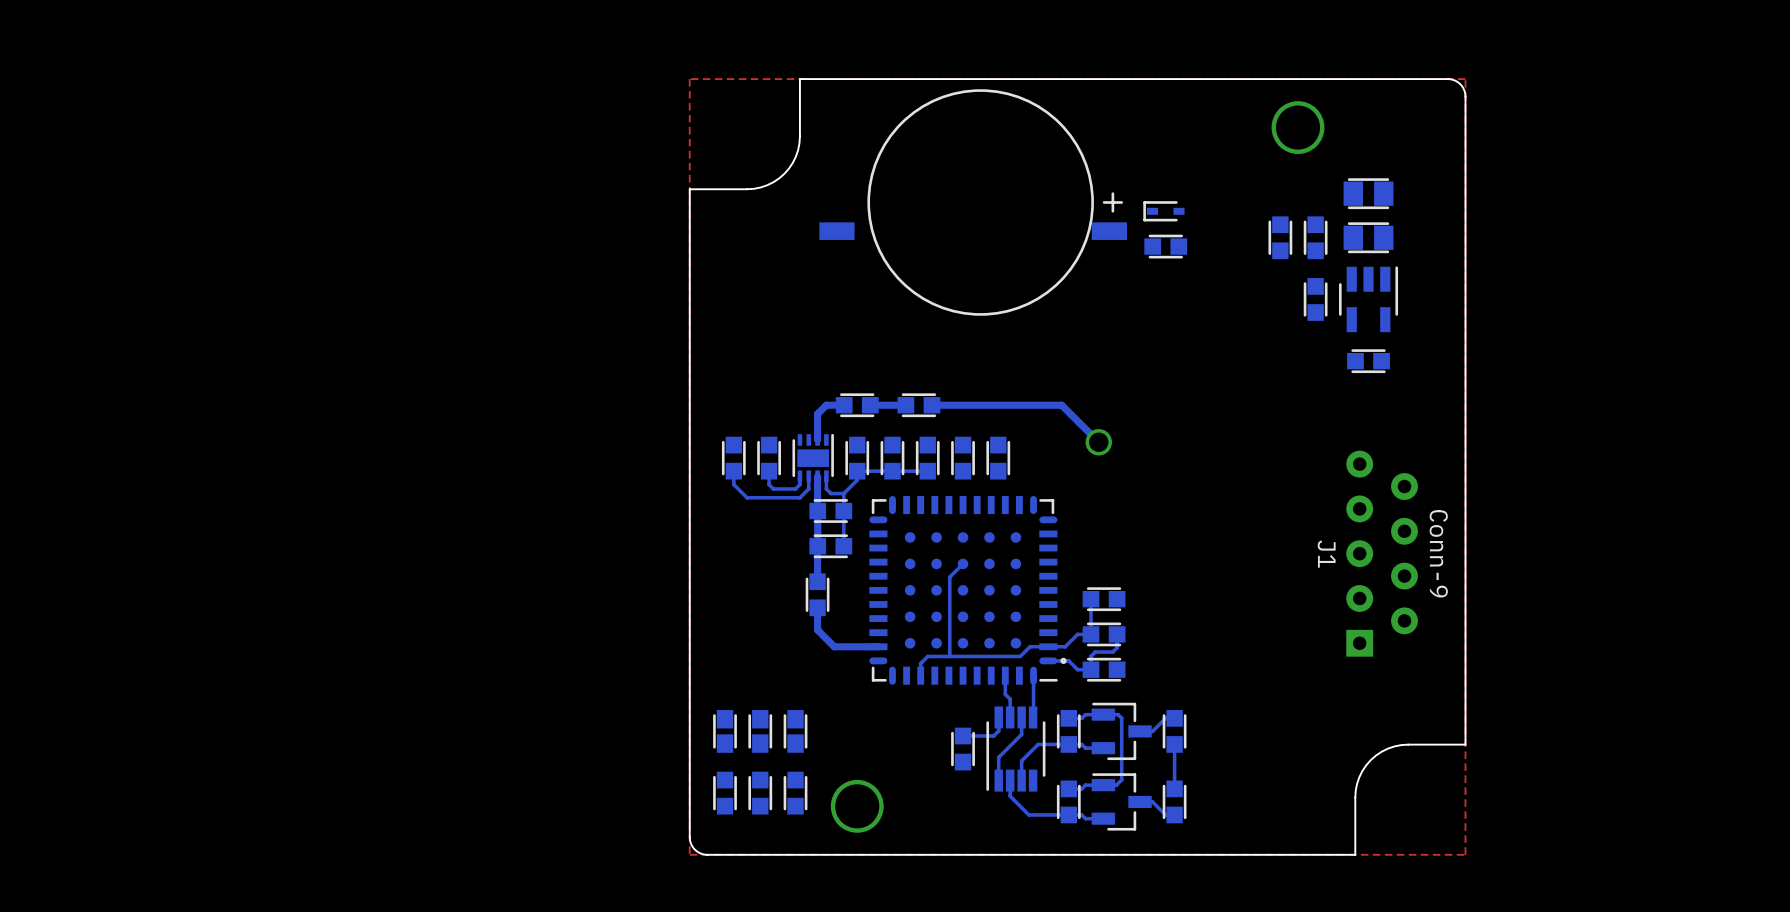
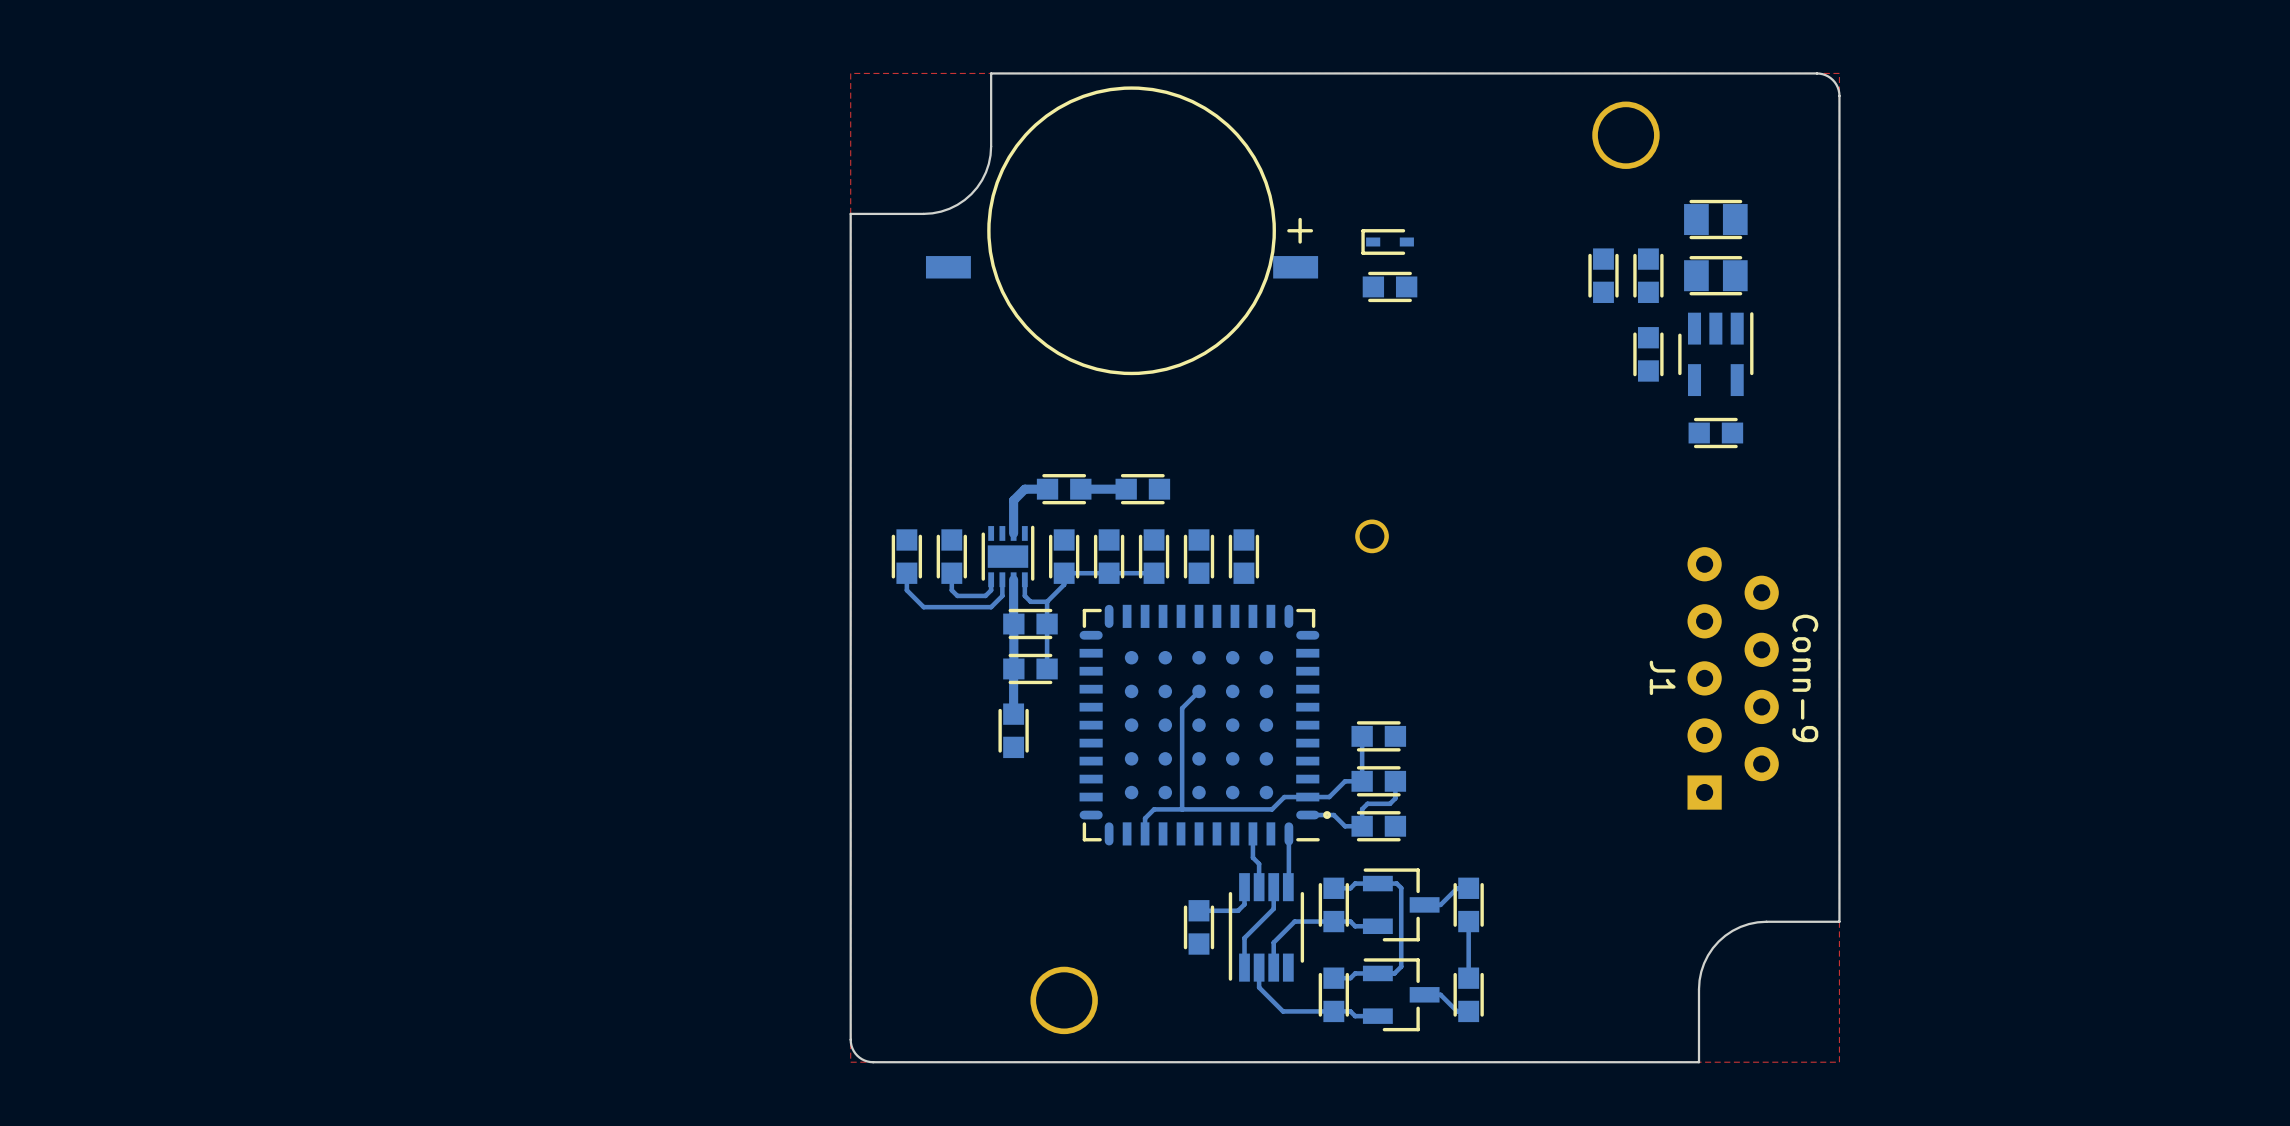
part position: (973, 202) -> (1122, 230)
part position: (1163, 211) -> (1387, 242)
part position: (1165, 246) -> (1390, 286)
bottom track: (931, 405) (1061, 405) (1098, 442) -> none
bottom track: (817, 607) (817, 630) (834, 646) (878, 646) -> none
part: (725, 731) -> none
part: (760, 731) -> none
part: (795, 731) -> none
part: (725, 793) -> none
part: (760, 793) -> none
part: (795, 793) -> none

